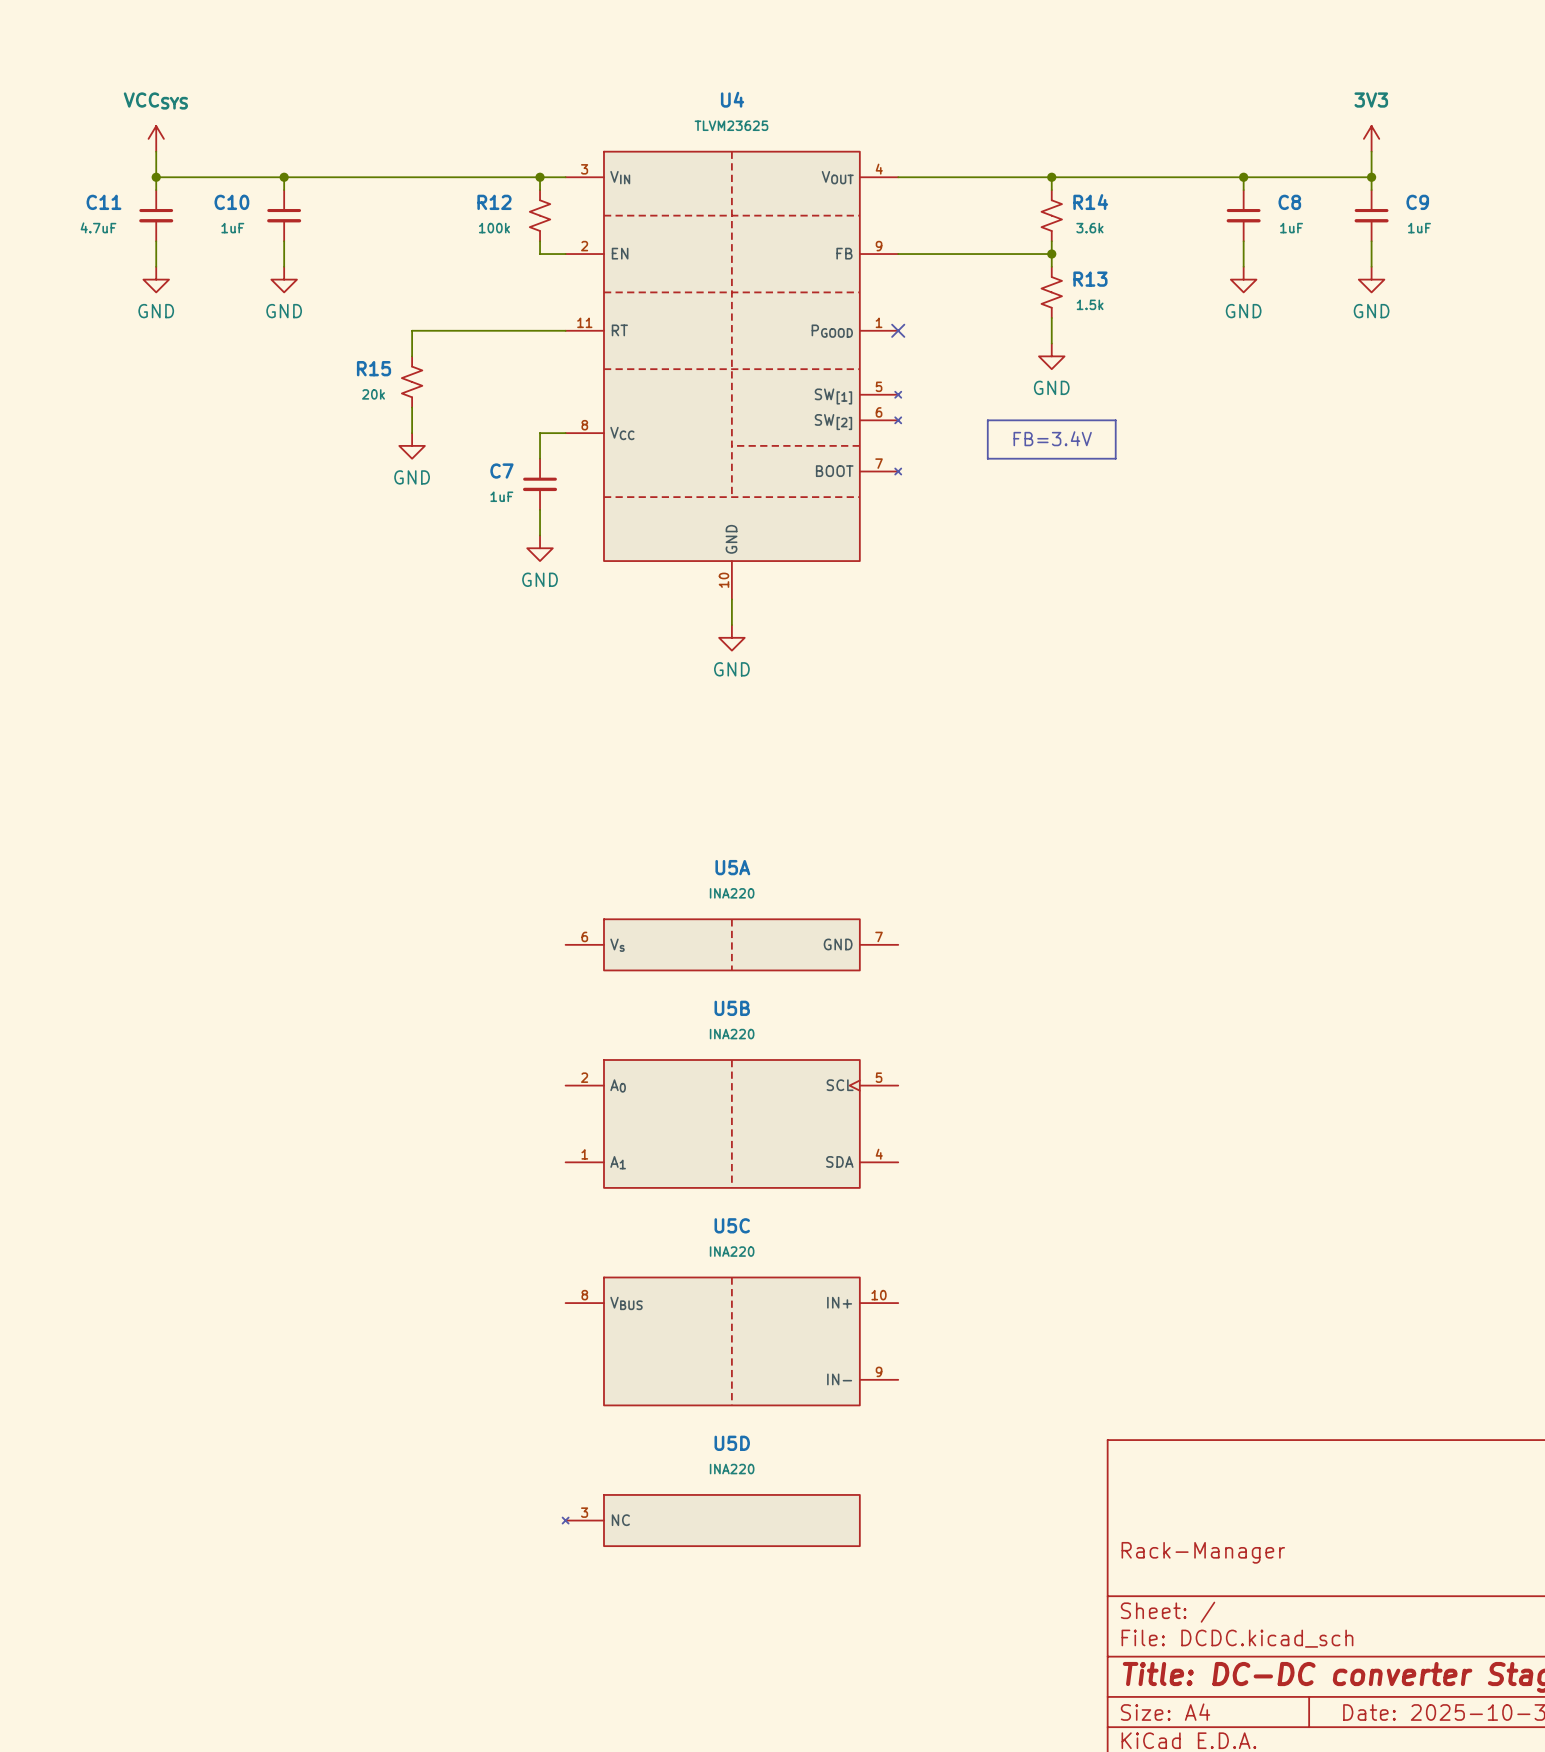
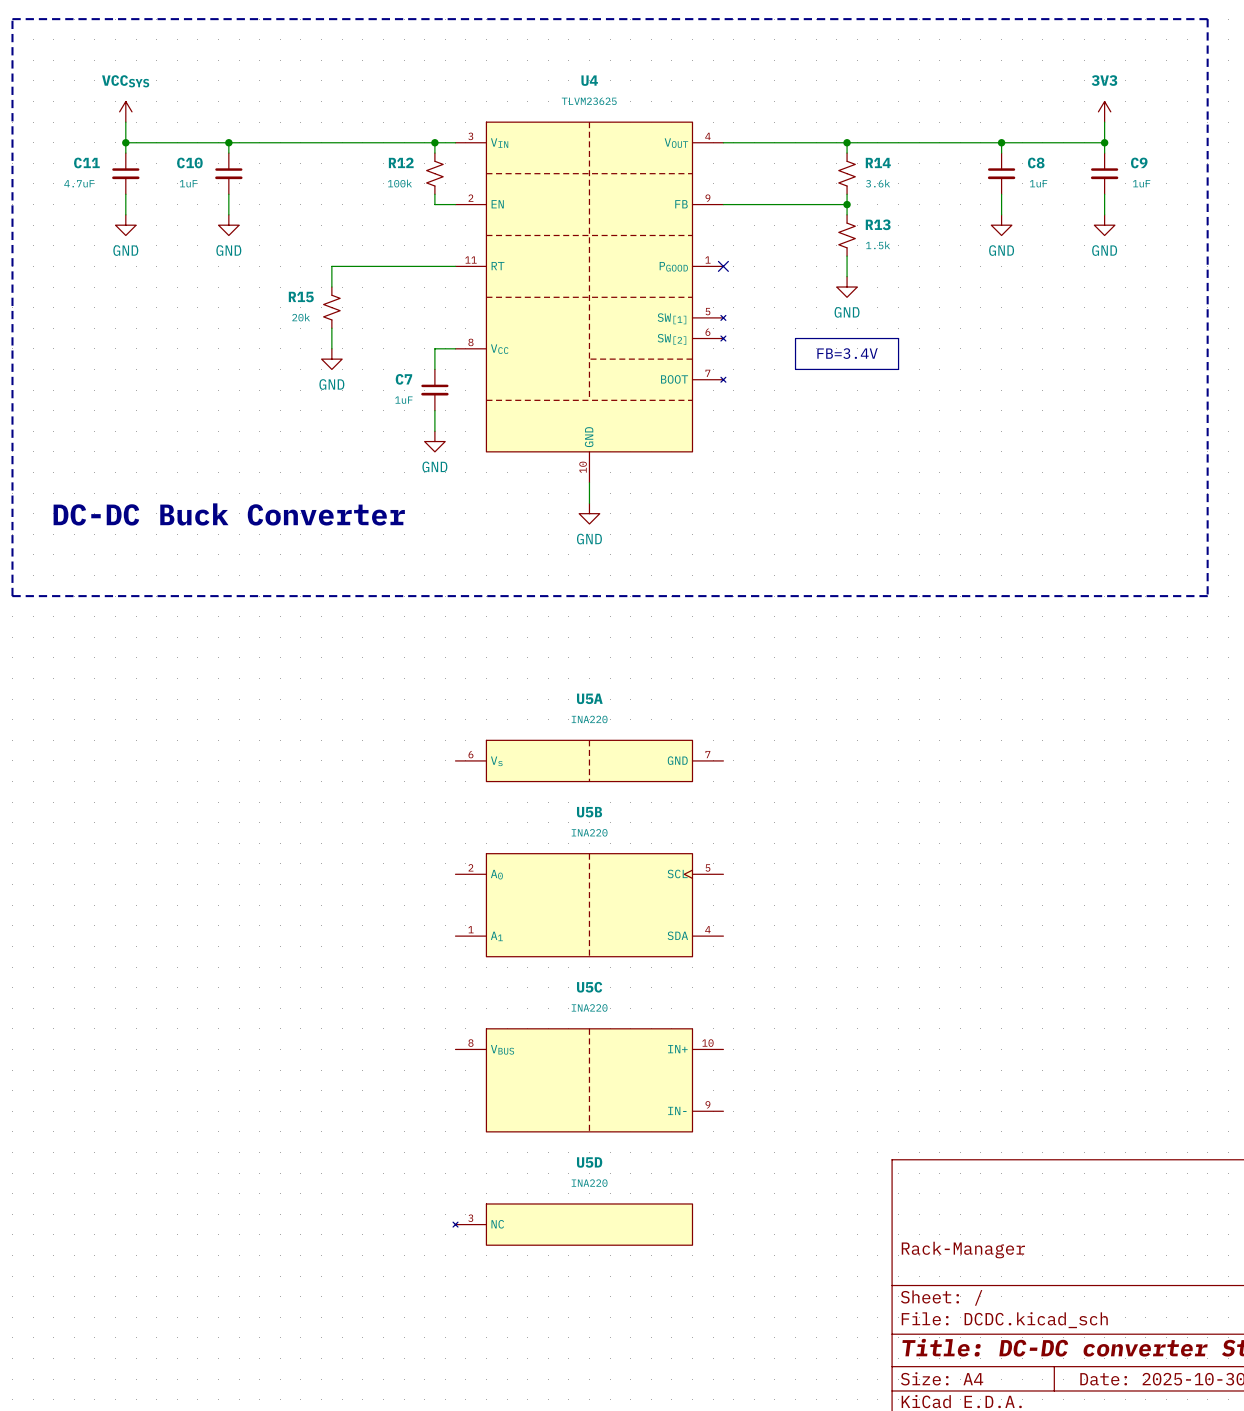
line: none -> (12, 19) (1207, 19) (1207, 596) (12, 596) (12, 19)
text: none -> DC-DC Buck Converter (229, 514)

